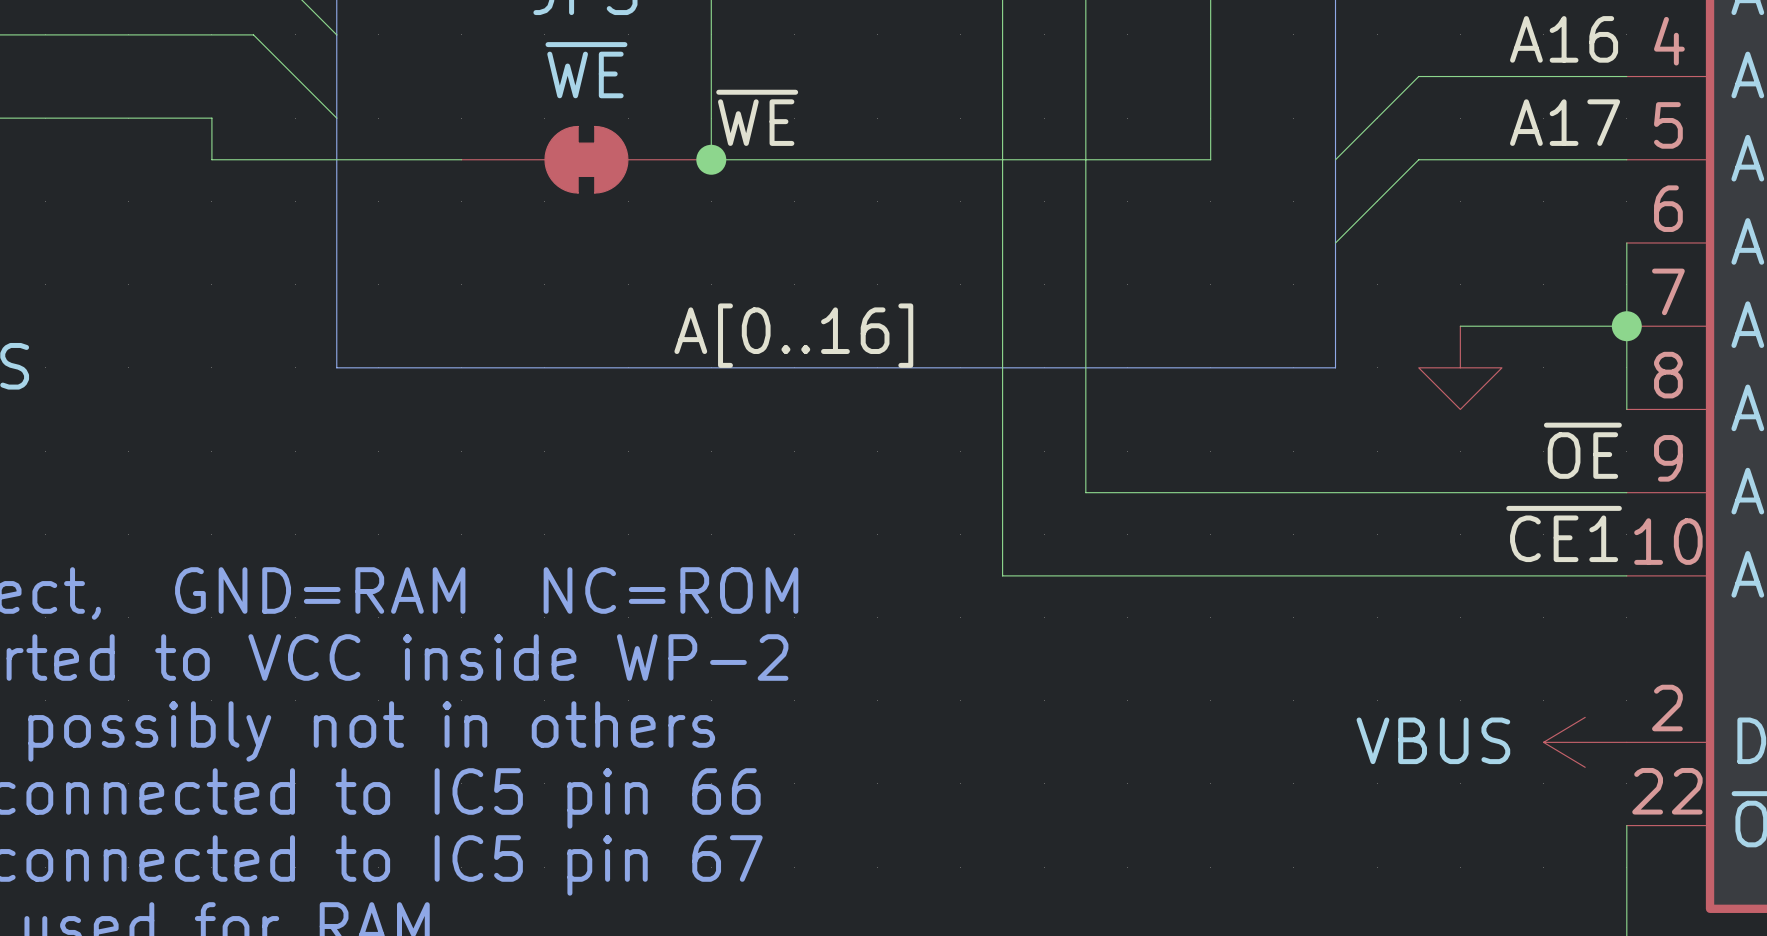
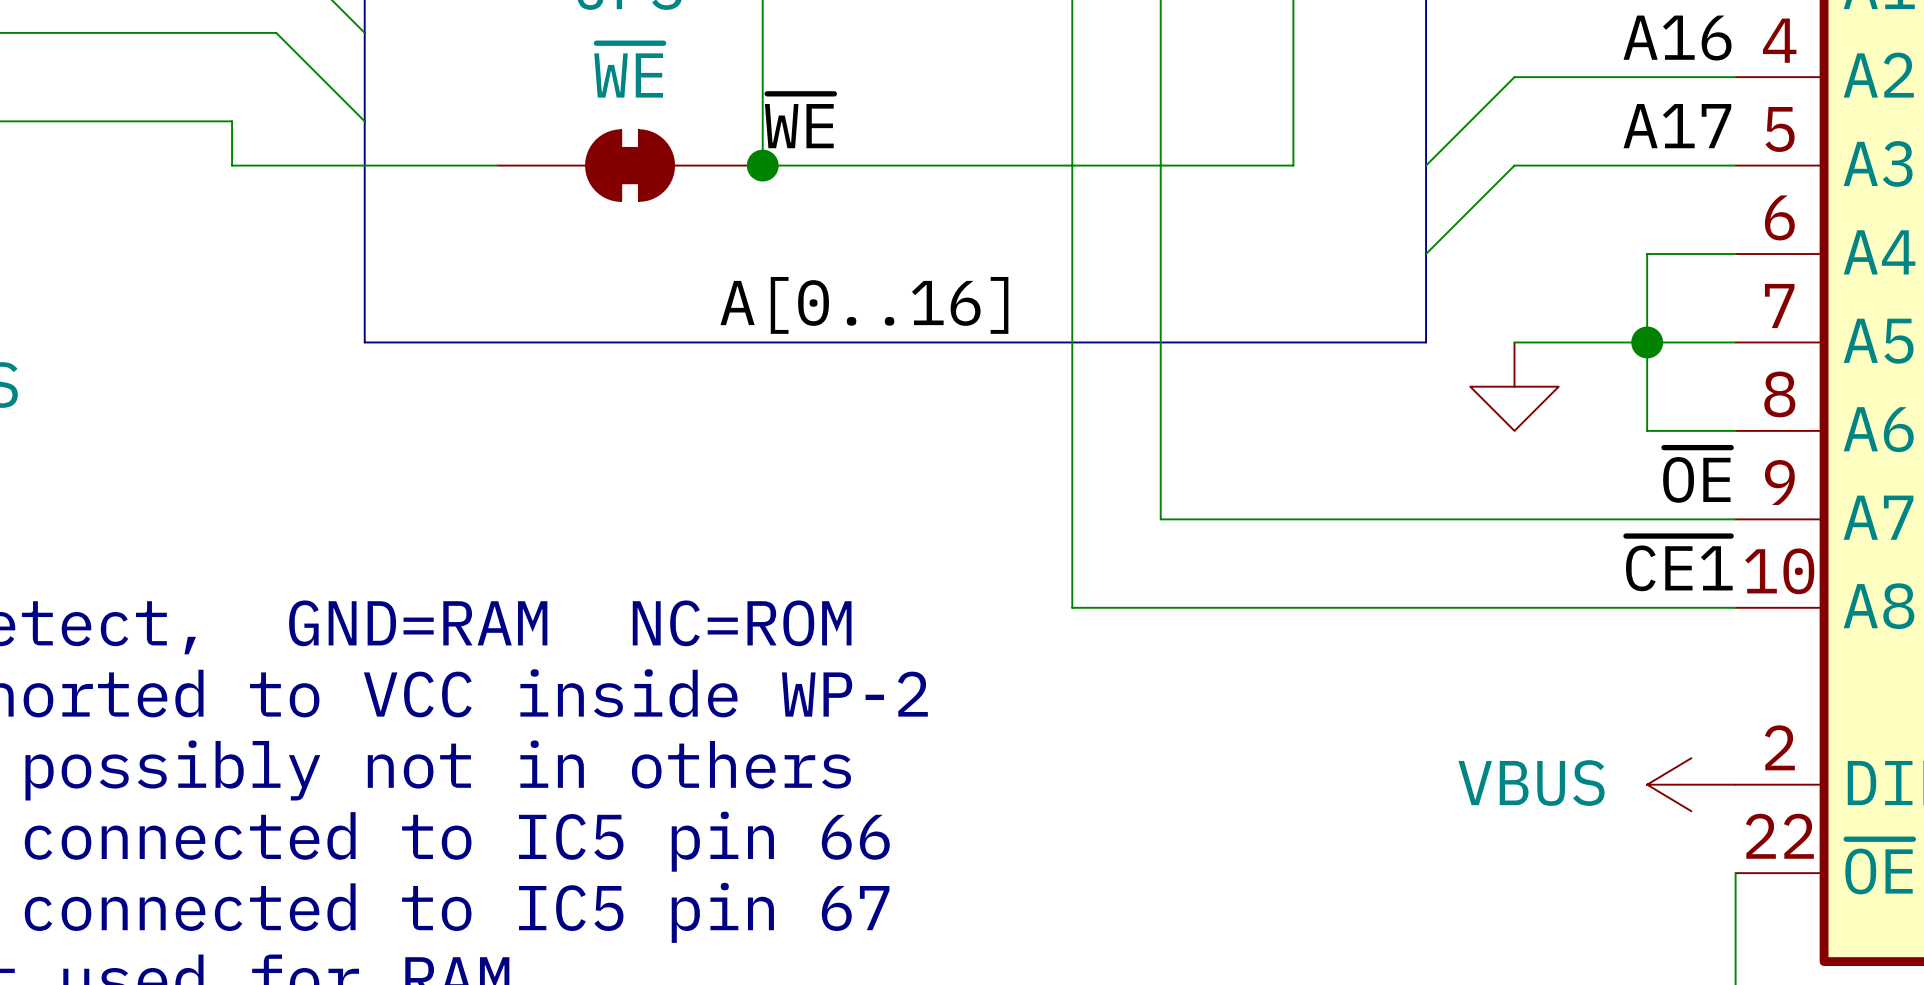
wire: (1626, 242) (1626, 409) -> (1735, 254) (1647, 254) (1647, 430) (1735, 430)
bus: (336, 326) (336, 367) (1335, 367) (1335, 326) -> (364, 342) (1426, 342)
wire: none -> (1514, 342) (1558, 342)
junction position: (1626, 326) -> (1647, 342)
label position: A[0..16] (793, 335) -> A[0..16] (864, 305)
power symbol position: (1460, 367) -> (1514, 386)

